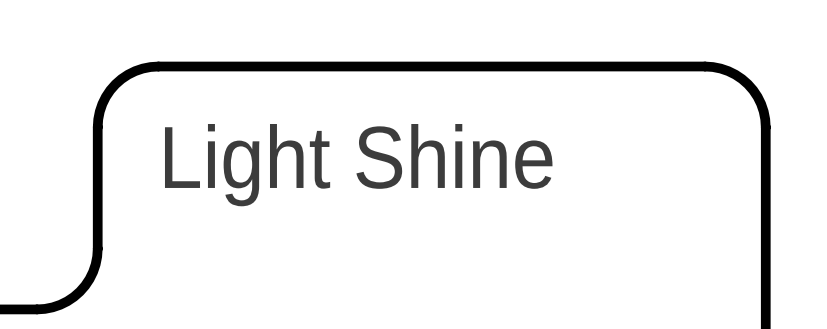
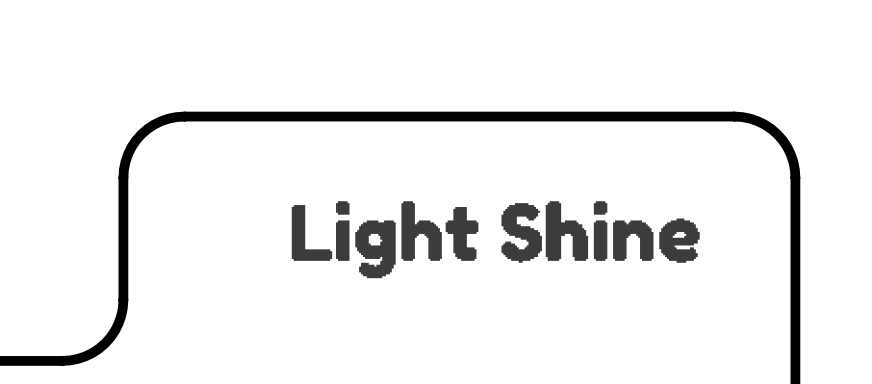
drawing: none -> [291, 201, 700, 279]
text: Light Shine (358, 165) -> none

